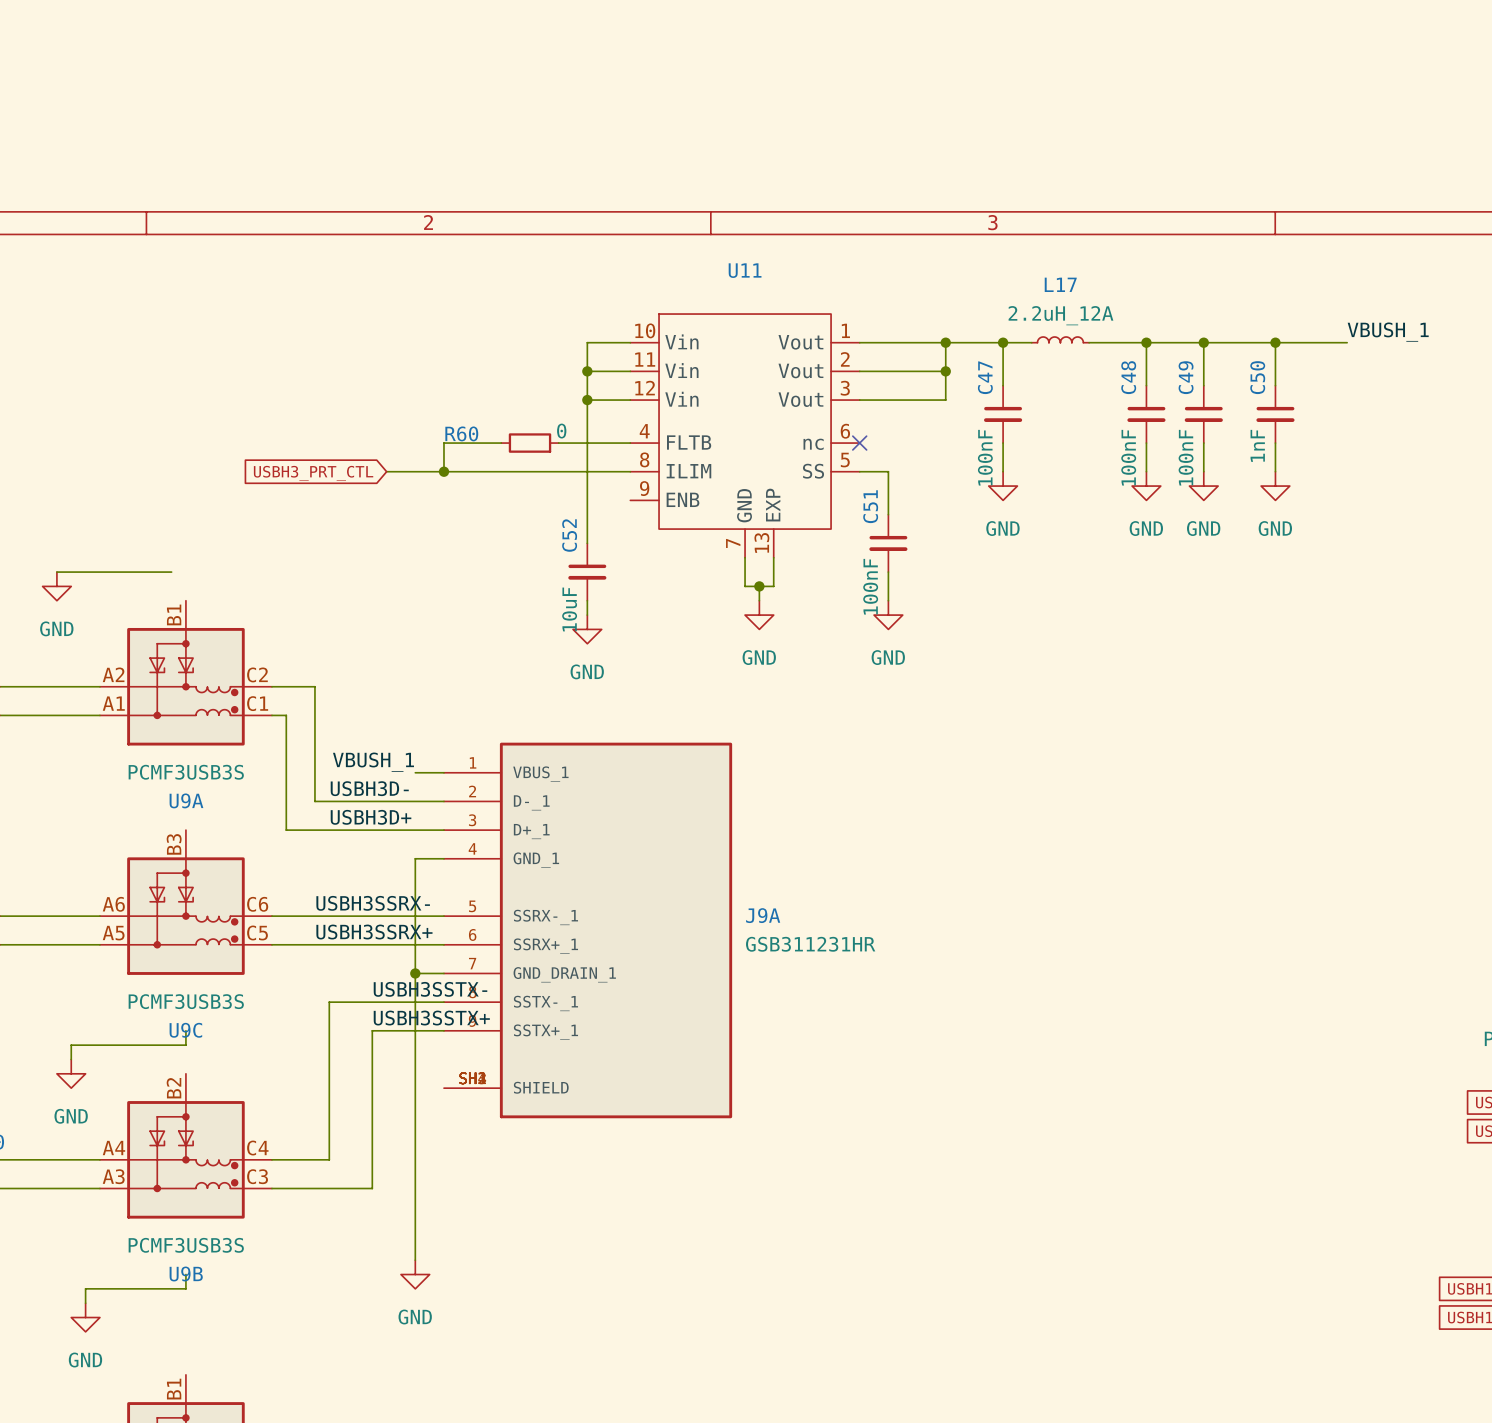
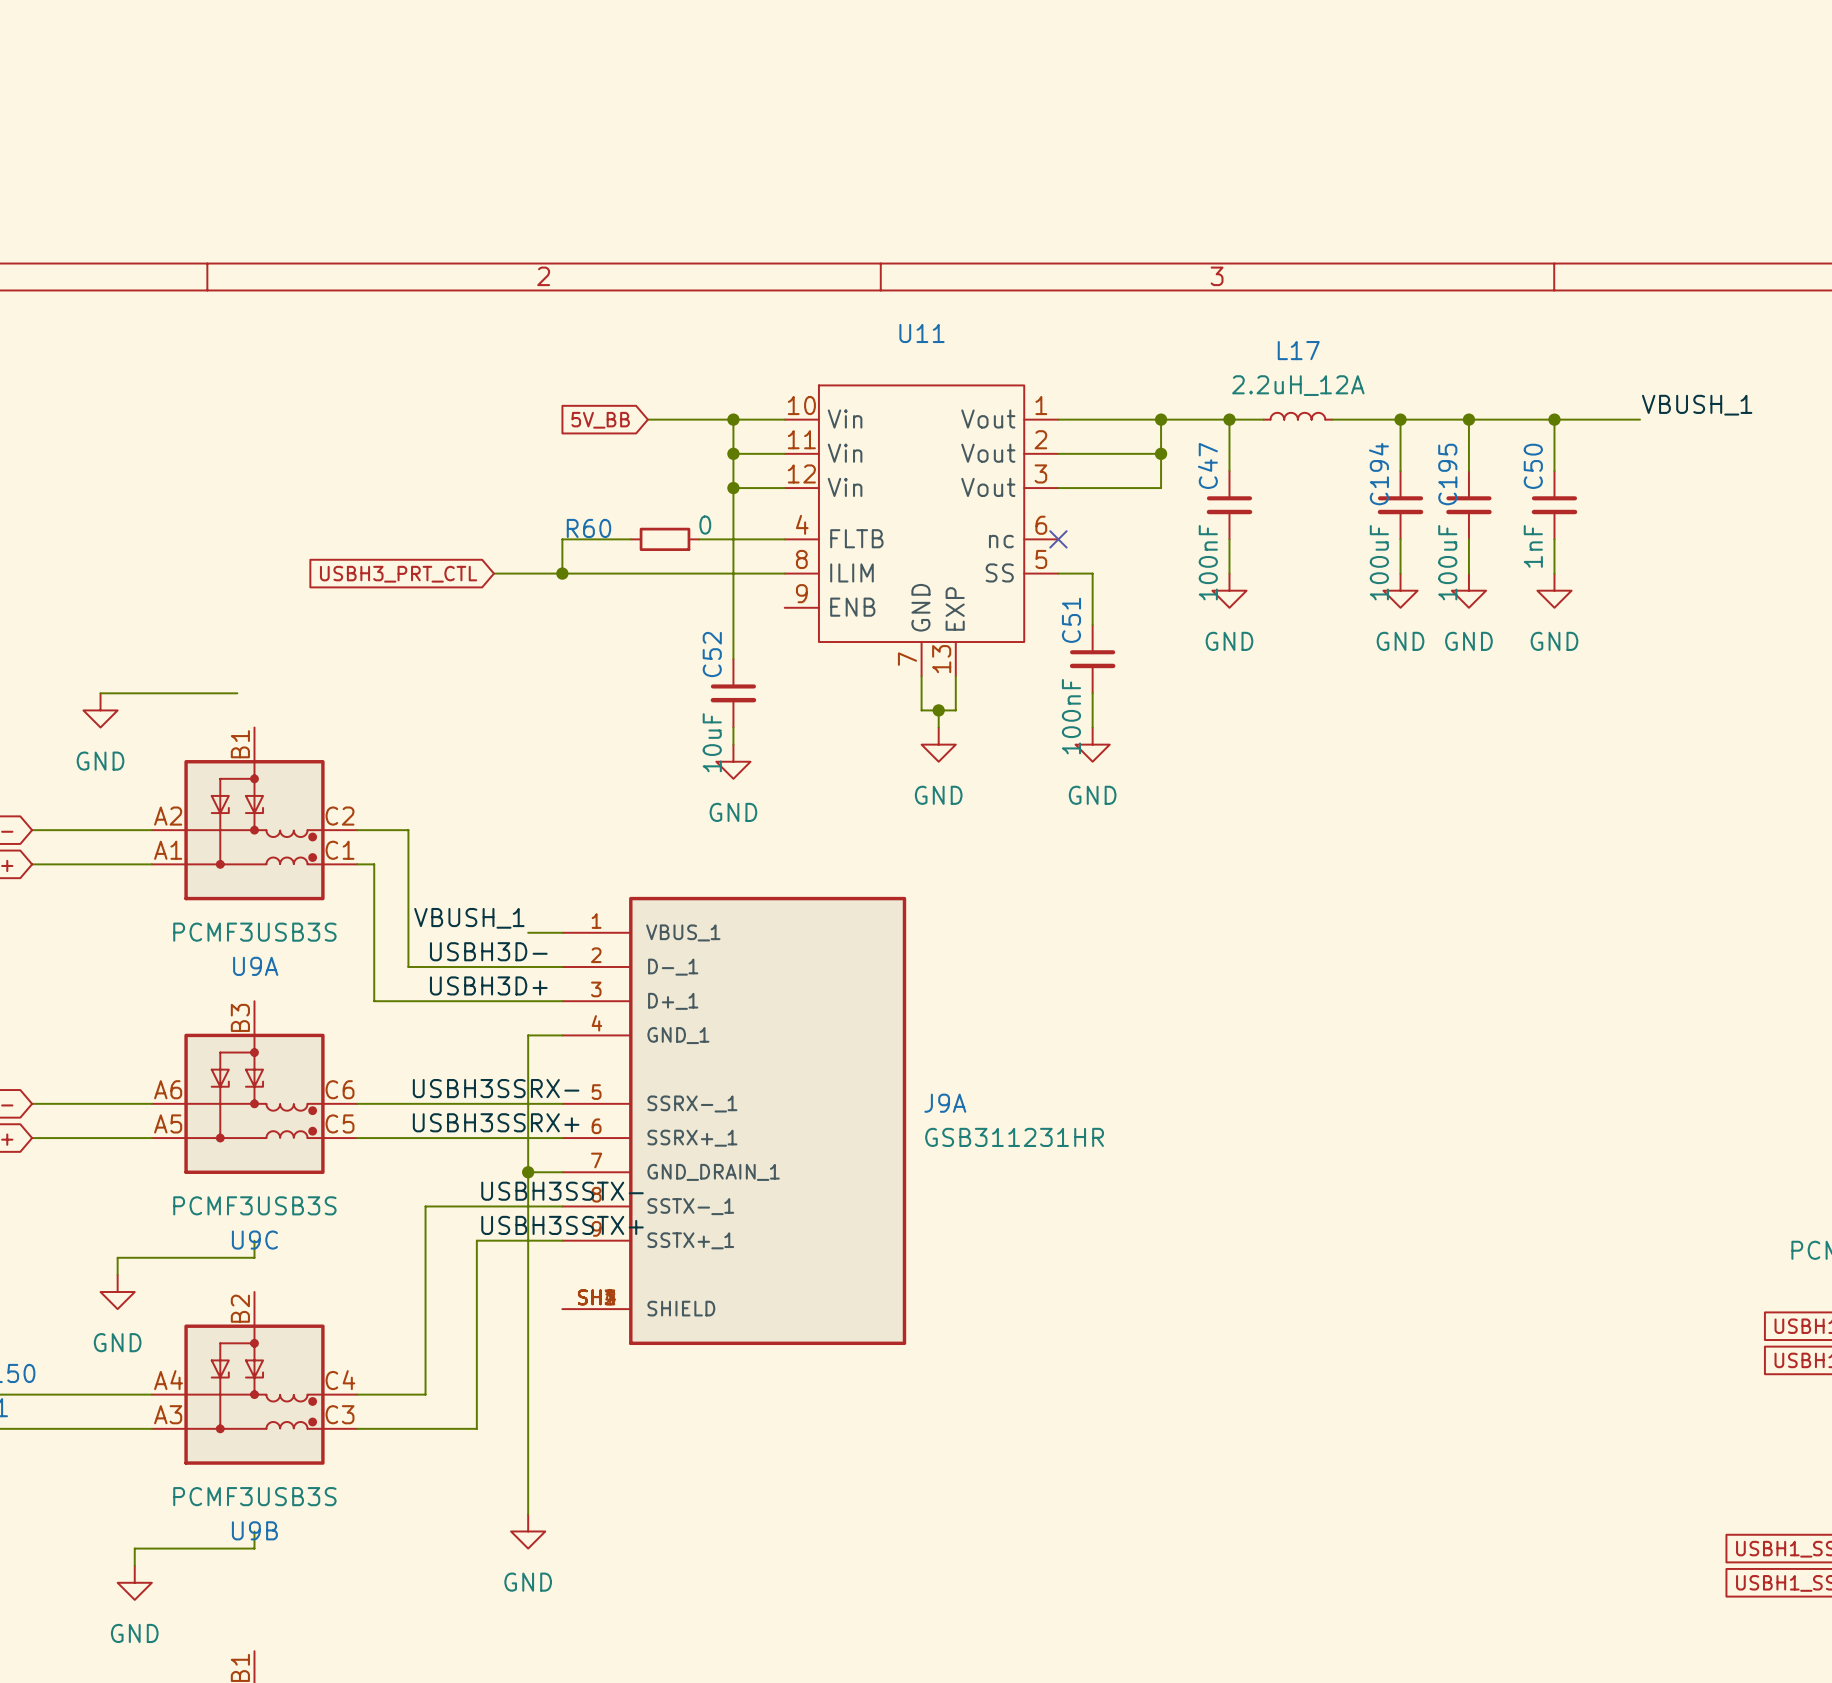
wire: none -> (647, 419) (733, 419)
junction: none -> (733, 419)
global label: none -> 5V_BB (600, 420)
C48 name: C48 (1128, 377) -> C194 (1378, 474)
C49 name: C49 (1186, 377) -> C195 (1447, 474)
C48 value: 100nF (1128, 457) -> 100uF (1379, 562)
C49 value: 100nF (1186, 457) -> 100uF (1447, 562)

